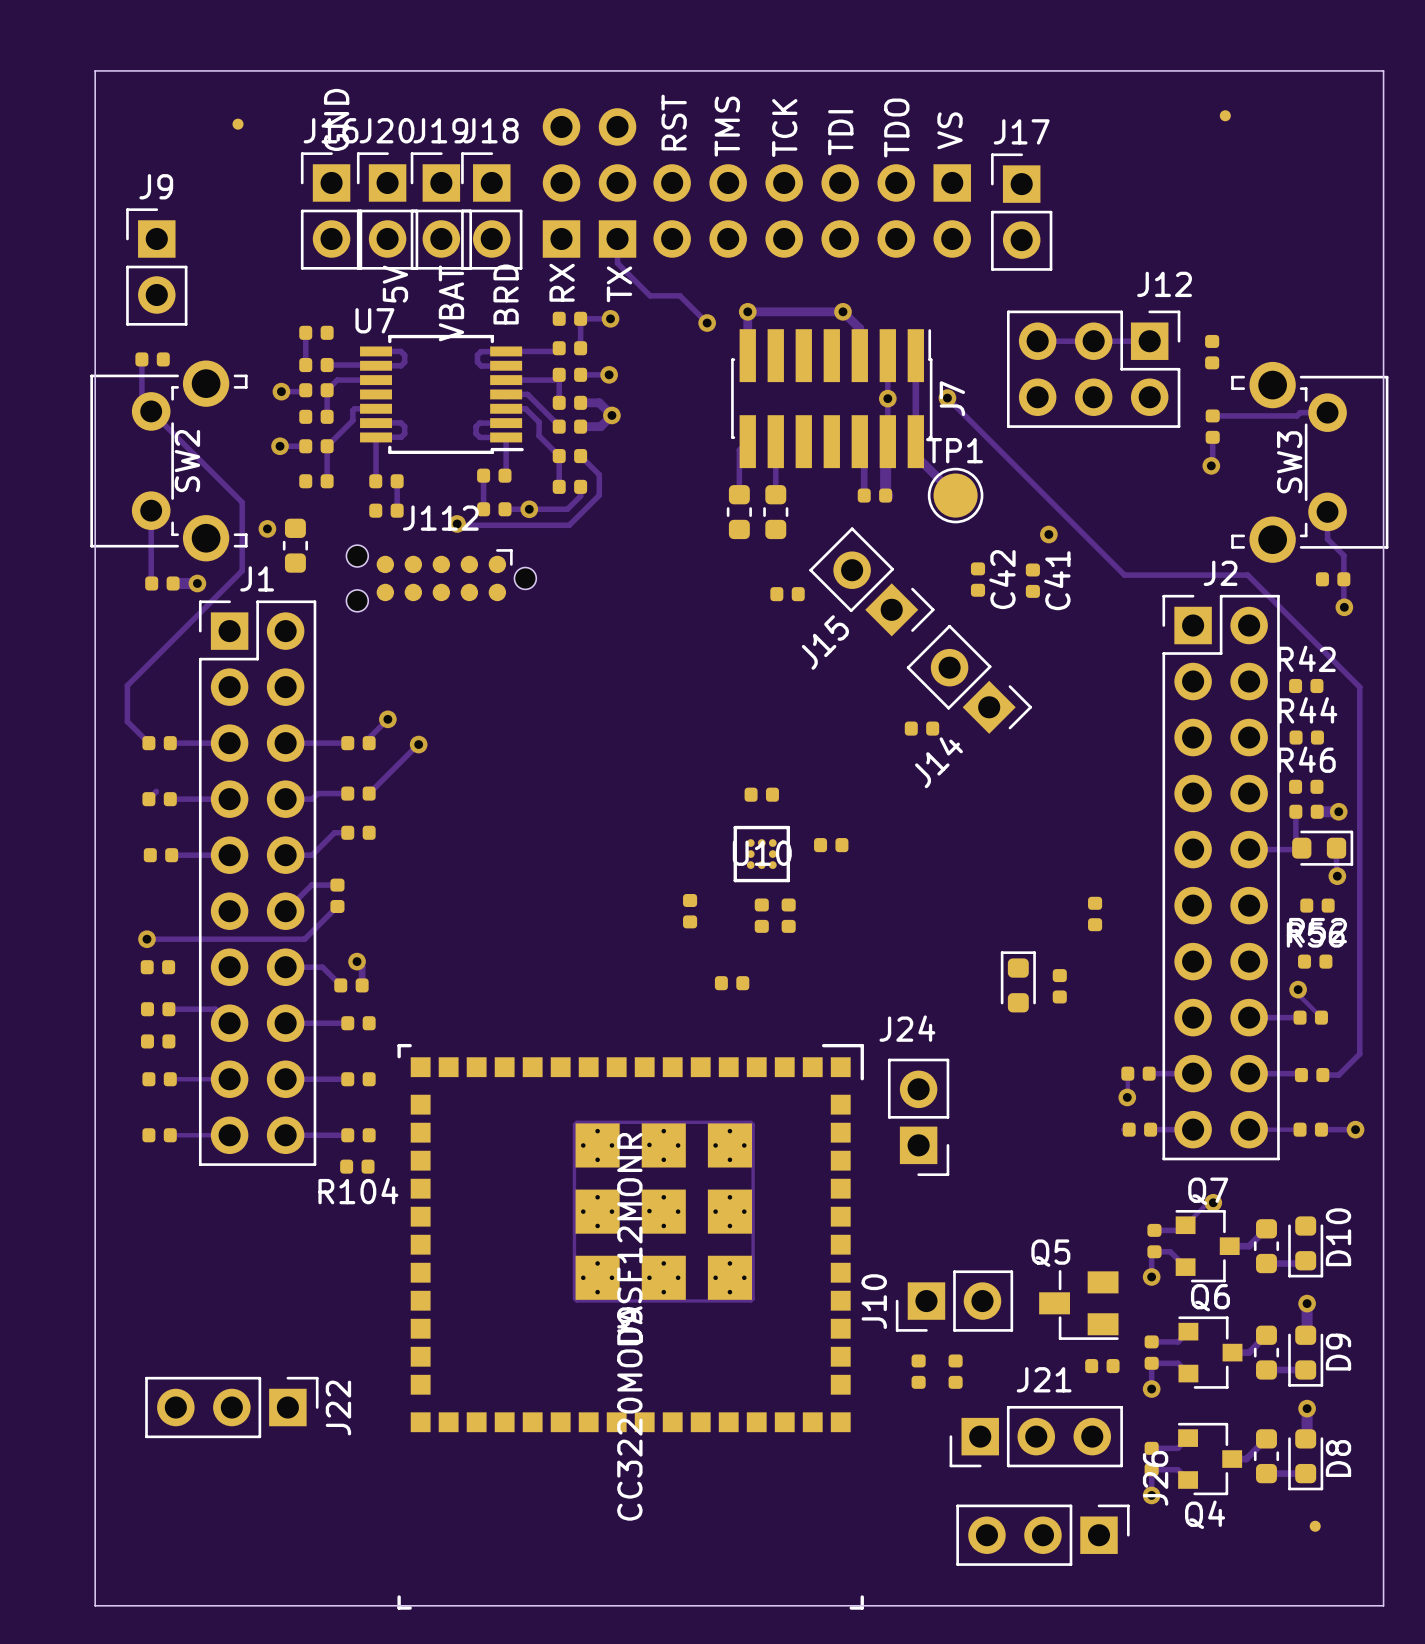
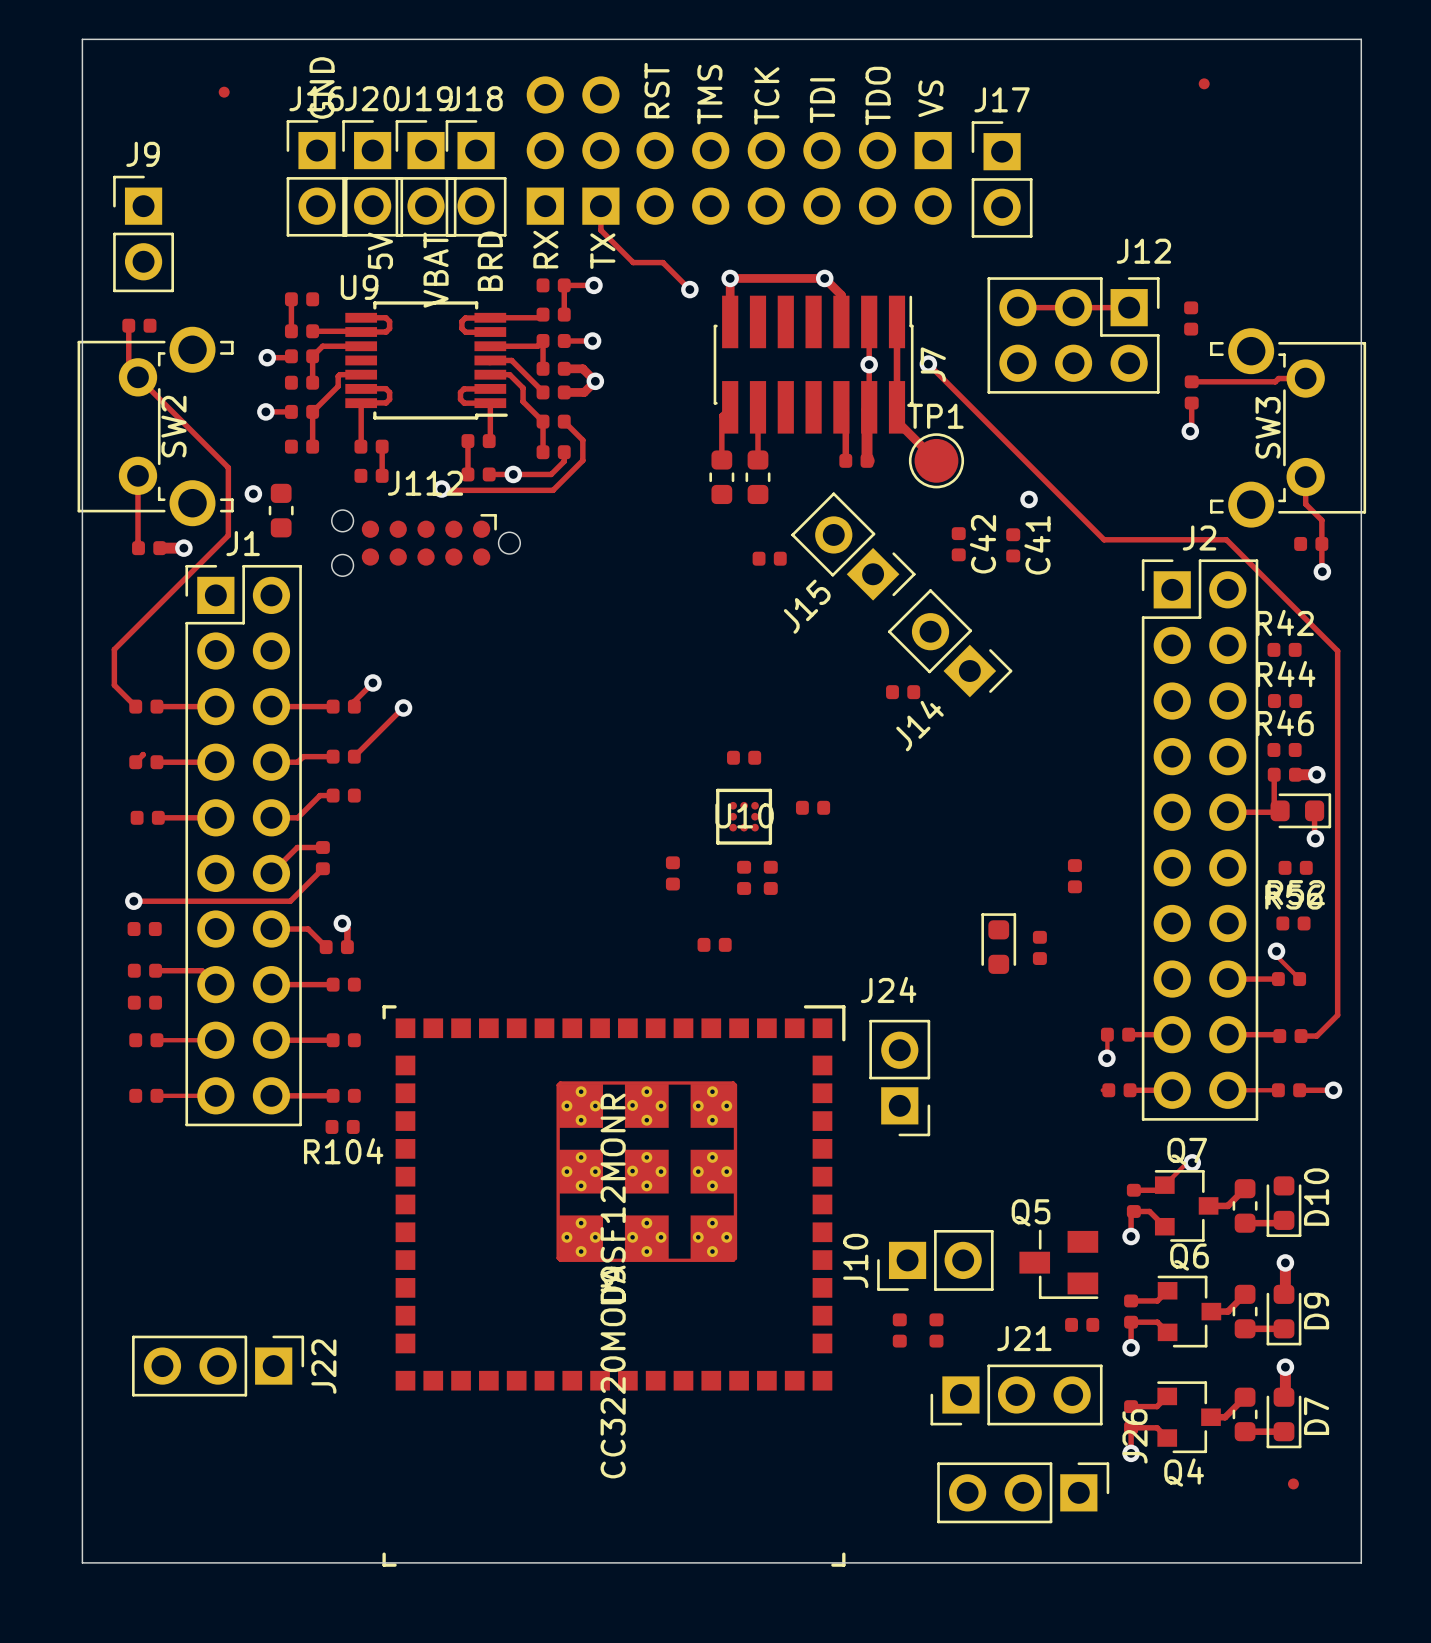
U7 name: U7 (374, 320) -> U9 (359, 287)
D8 name: D8 (1338, 1458) -> D7 (1316, 1416)

